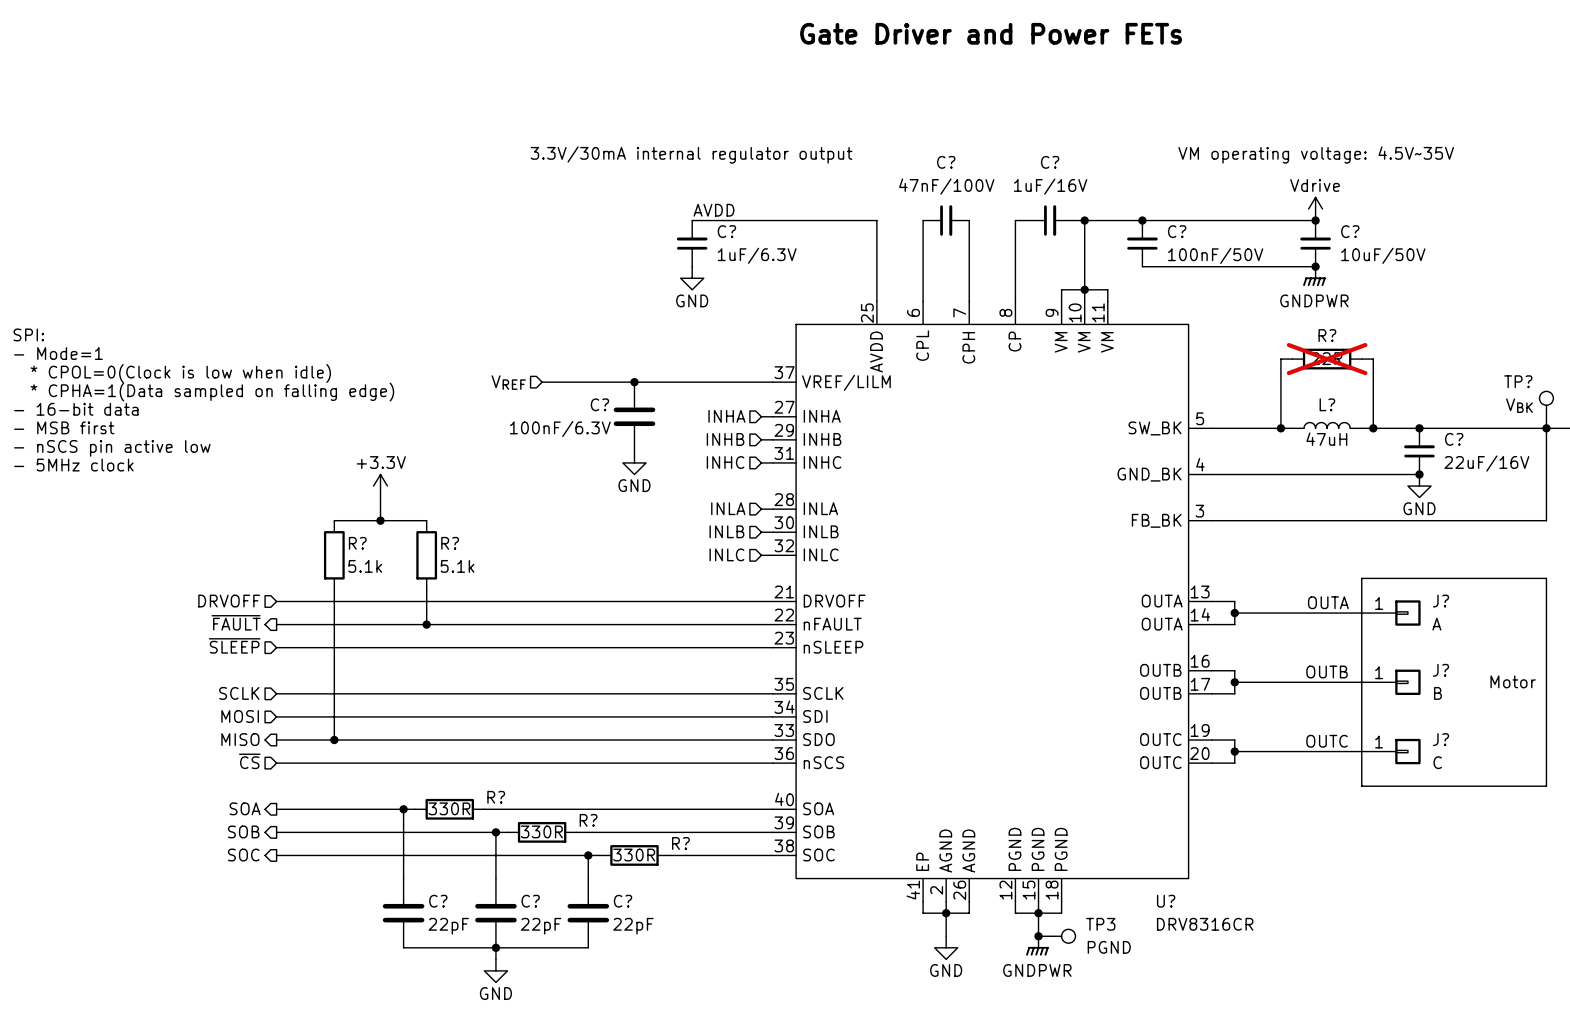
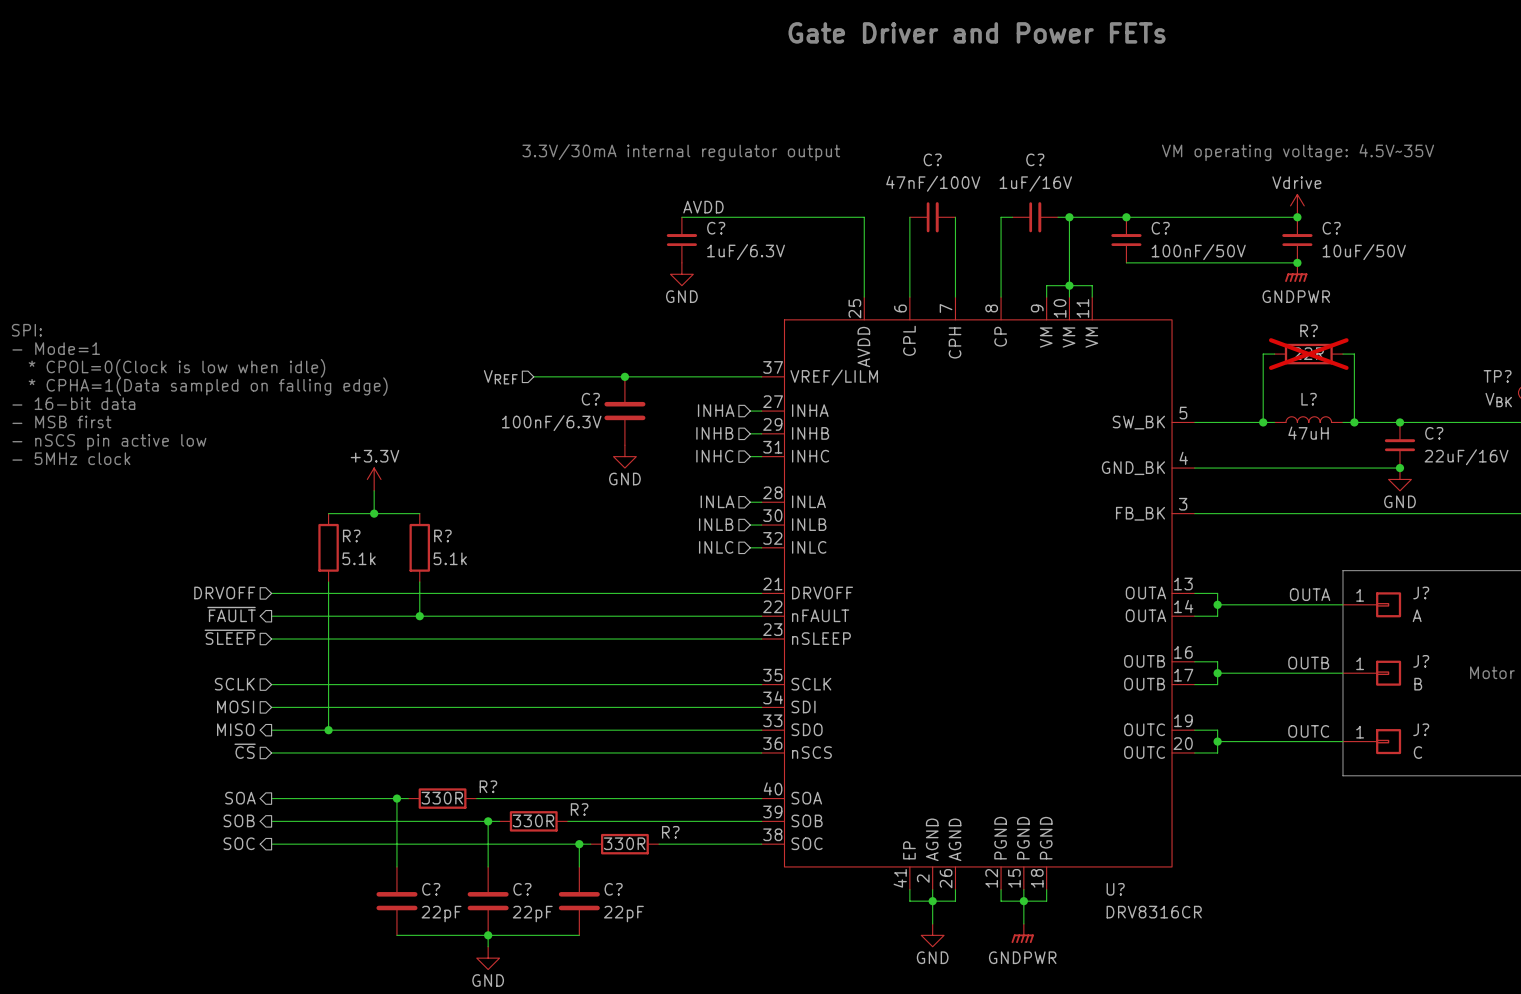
U? name position: U? (1166, 901) -> U? (1115, 889)
U? value position: DRV8316CR (1205, 924) -> DRV8316CR (1154, 912)
junction: (1038, 936) -> none
TP3: PGND (1056, 936) -> none

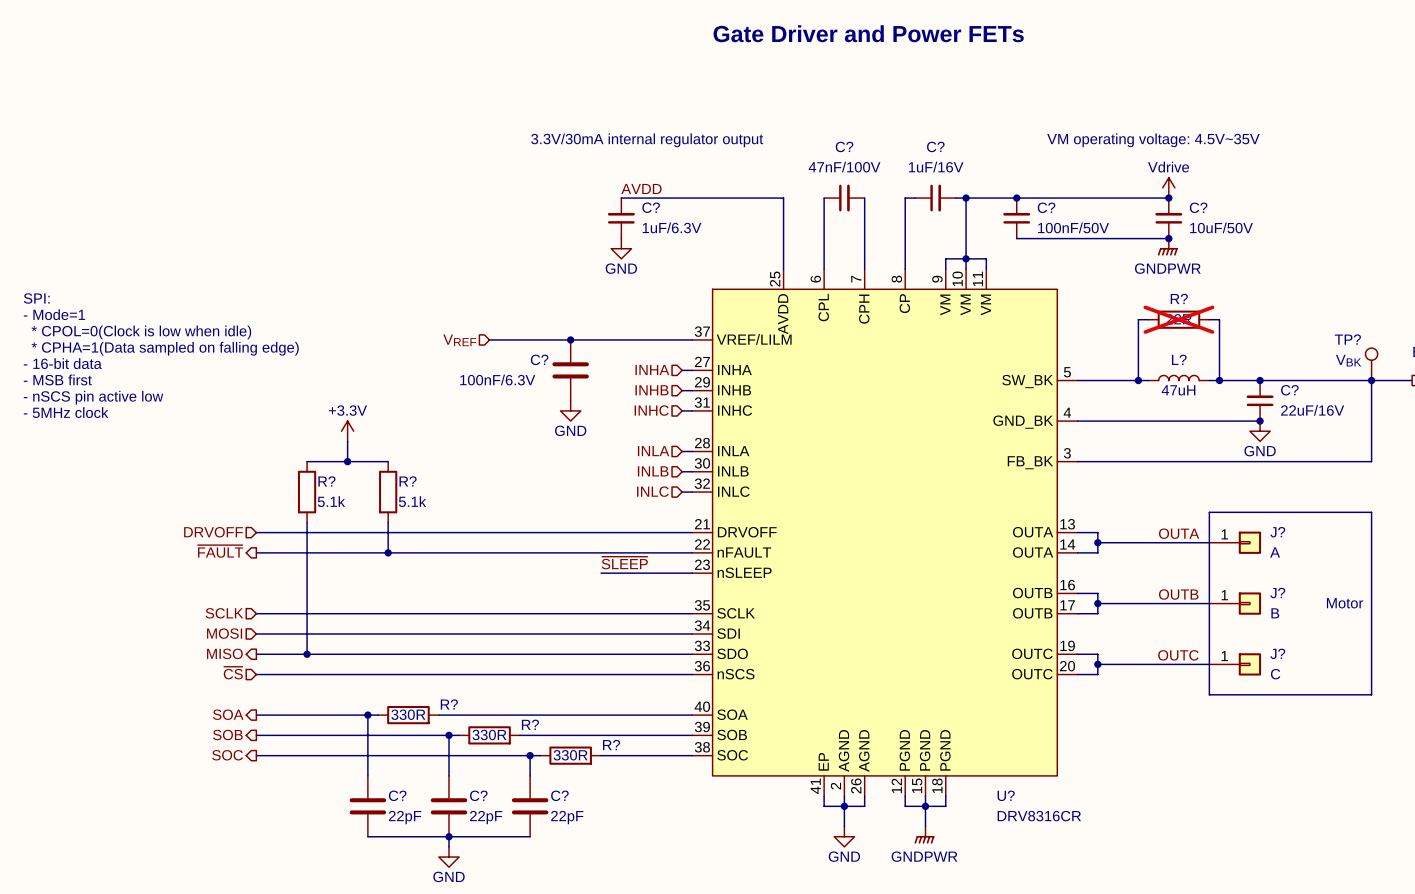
label: none -> ~{SLEEP} (624, 563)
hierarchical label: ~{SLEEP} (230, 637) -> none
wire: (271, 639) (659, 639) -> none

